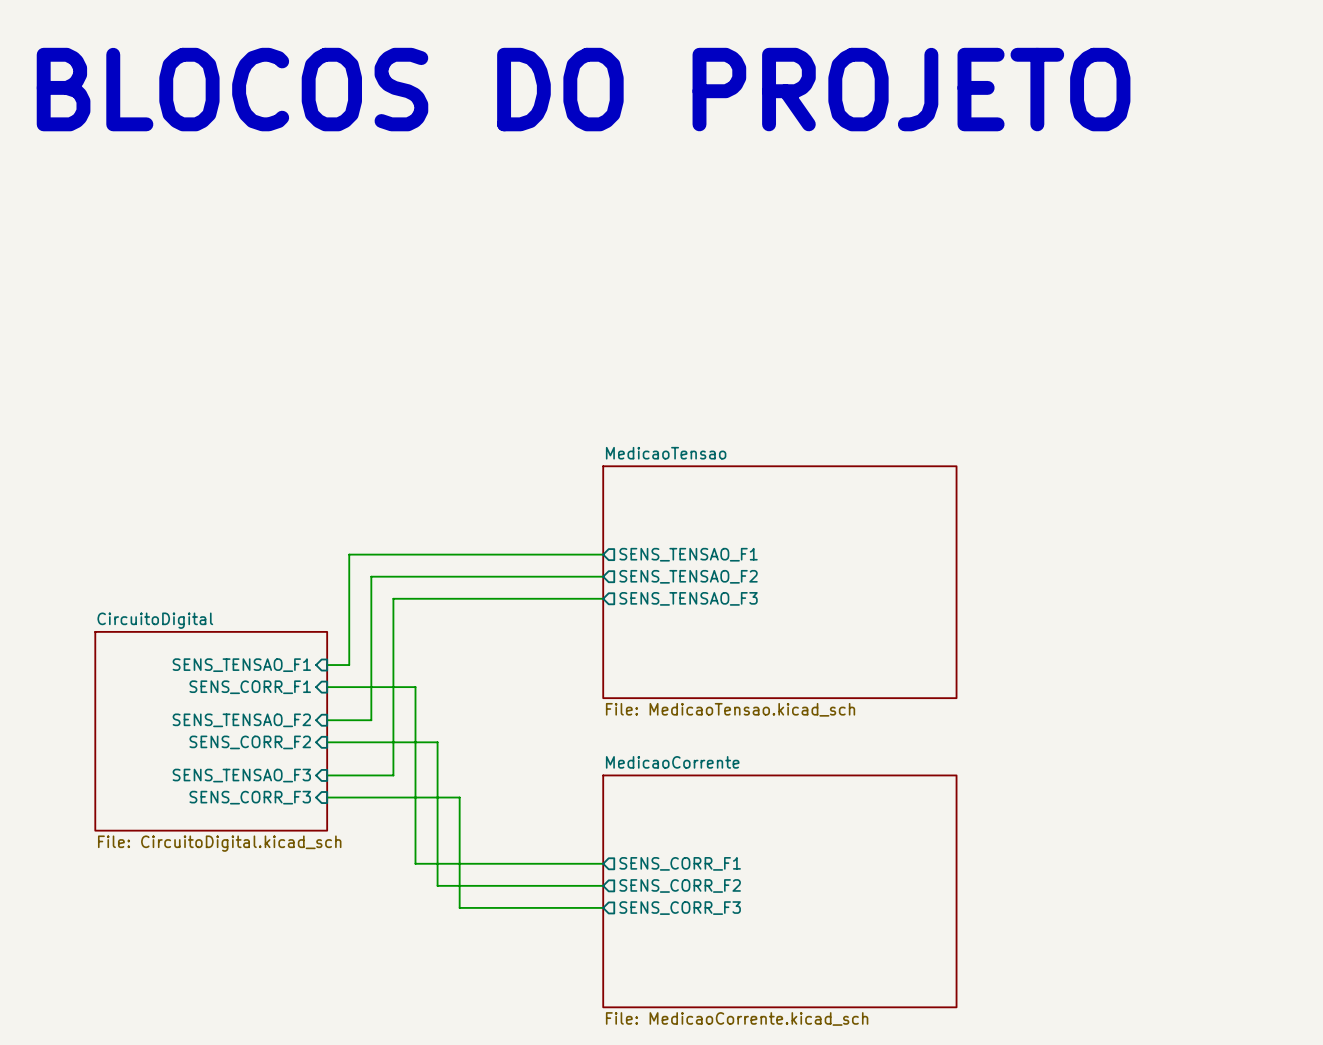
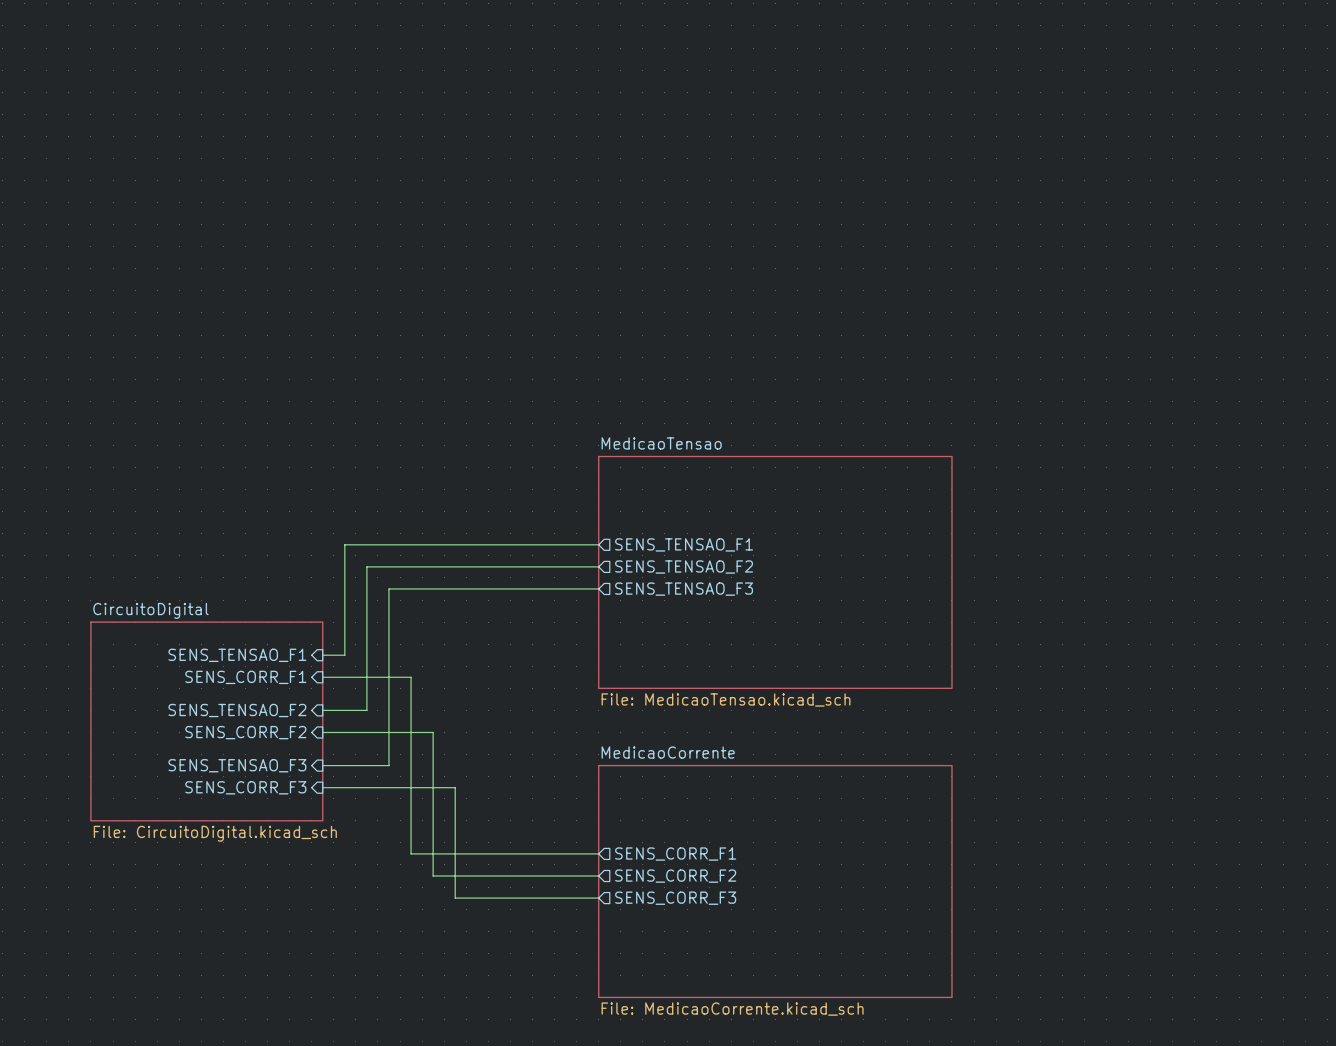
text: BLOCOS DO PROJETO (583, 89) -> none

